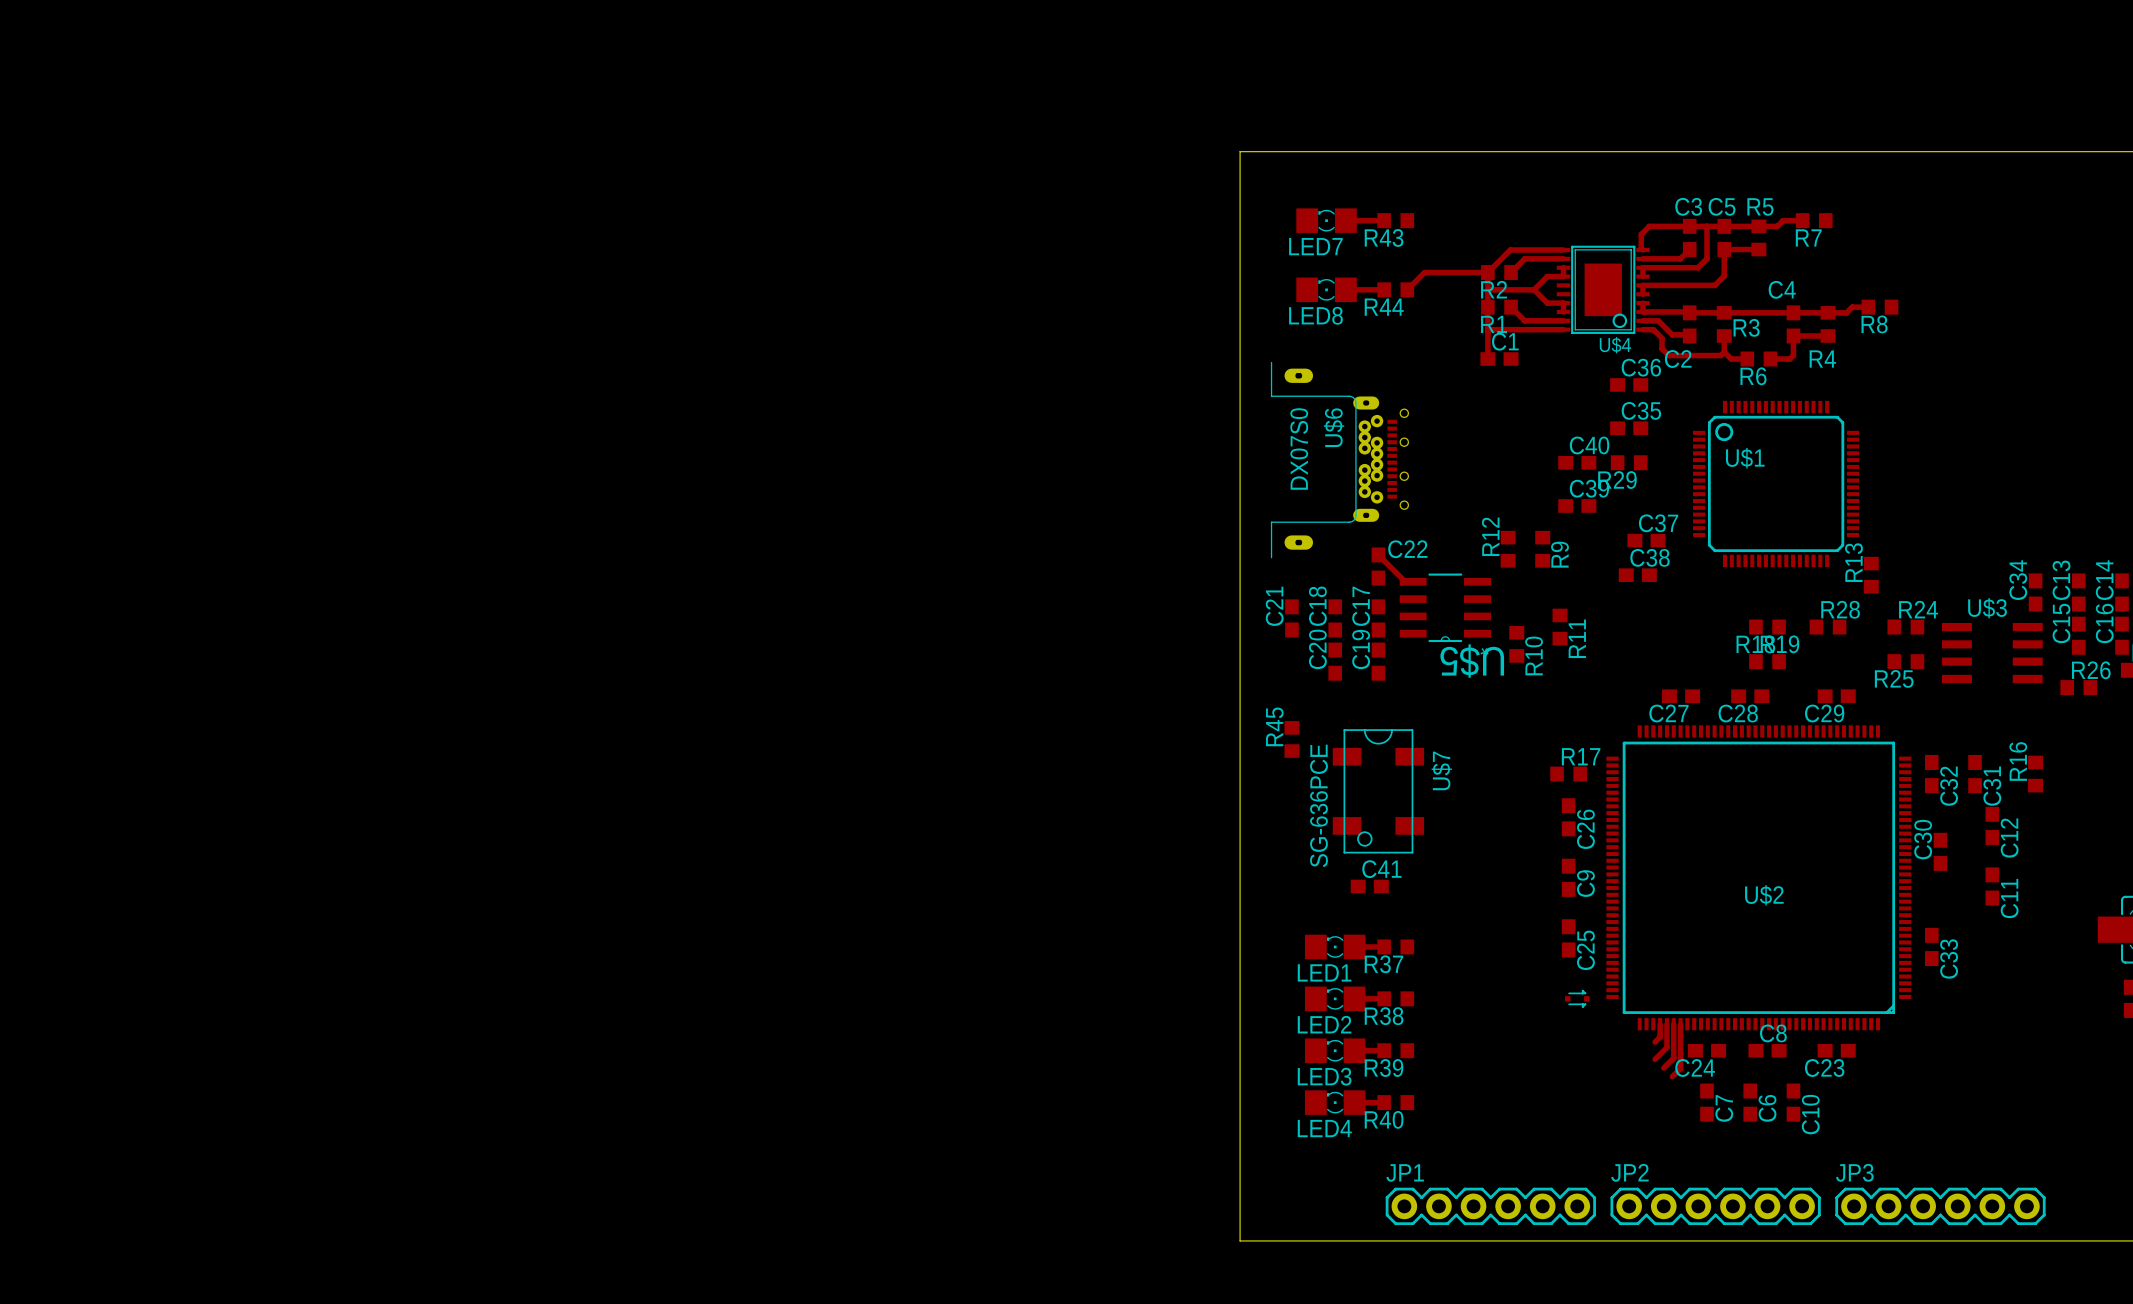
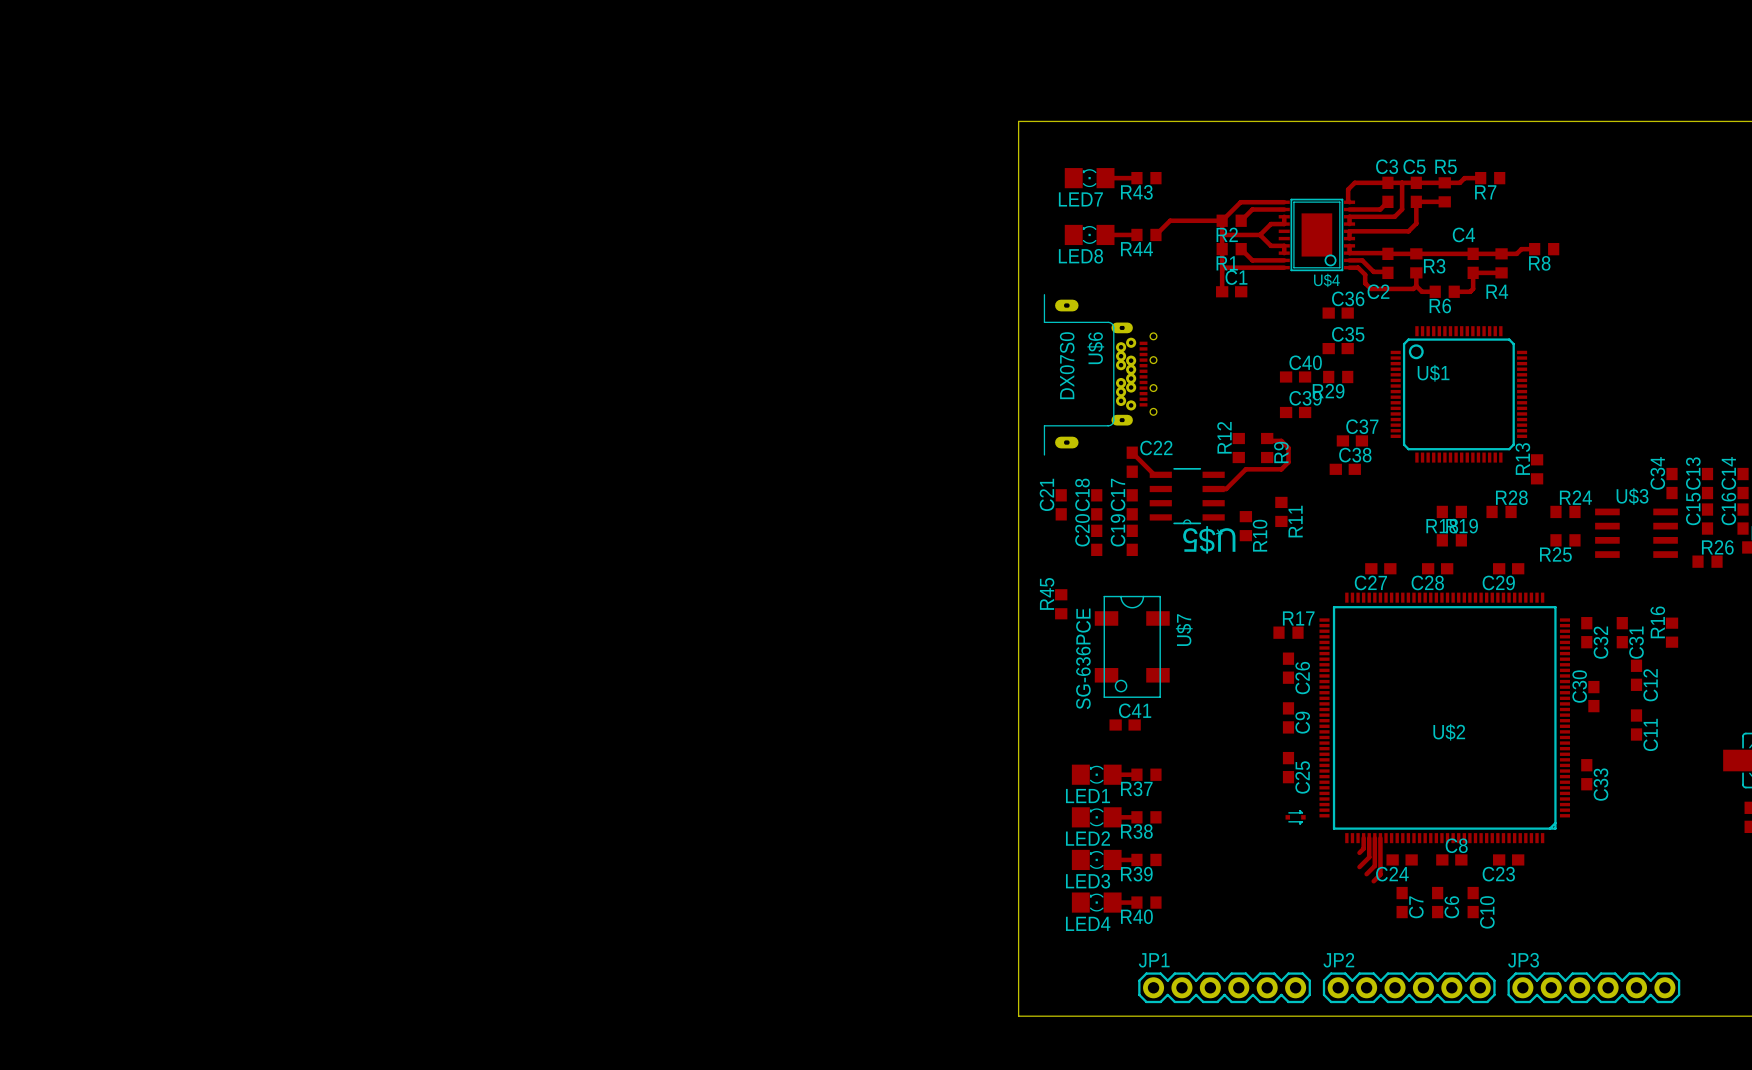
track: none -> (1267, 438) (1269, 440) (1281, 440) (1288, 448) (1288, 462) (1281, 469) (1245, 469) (1226, 489) (1213, 489)

